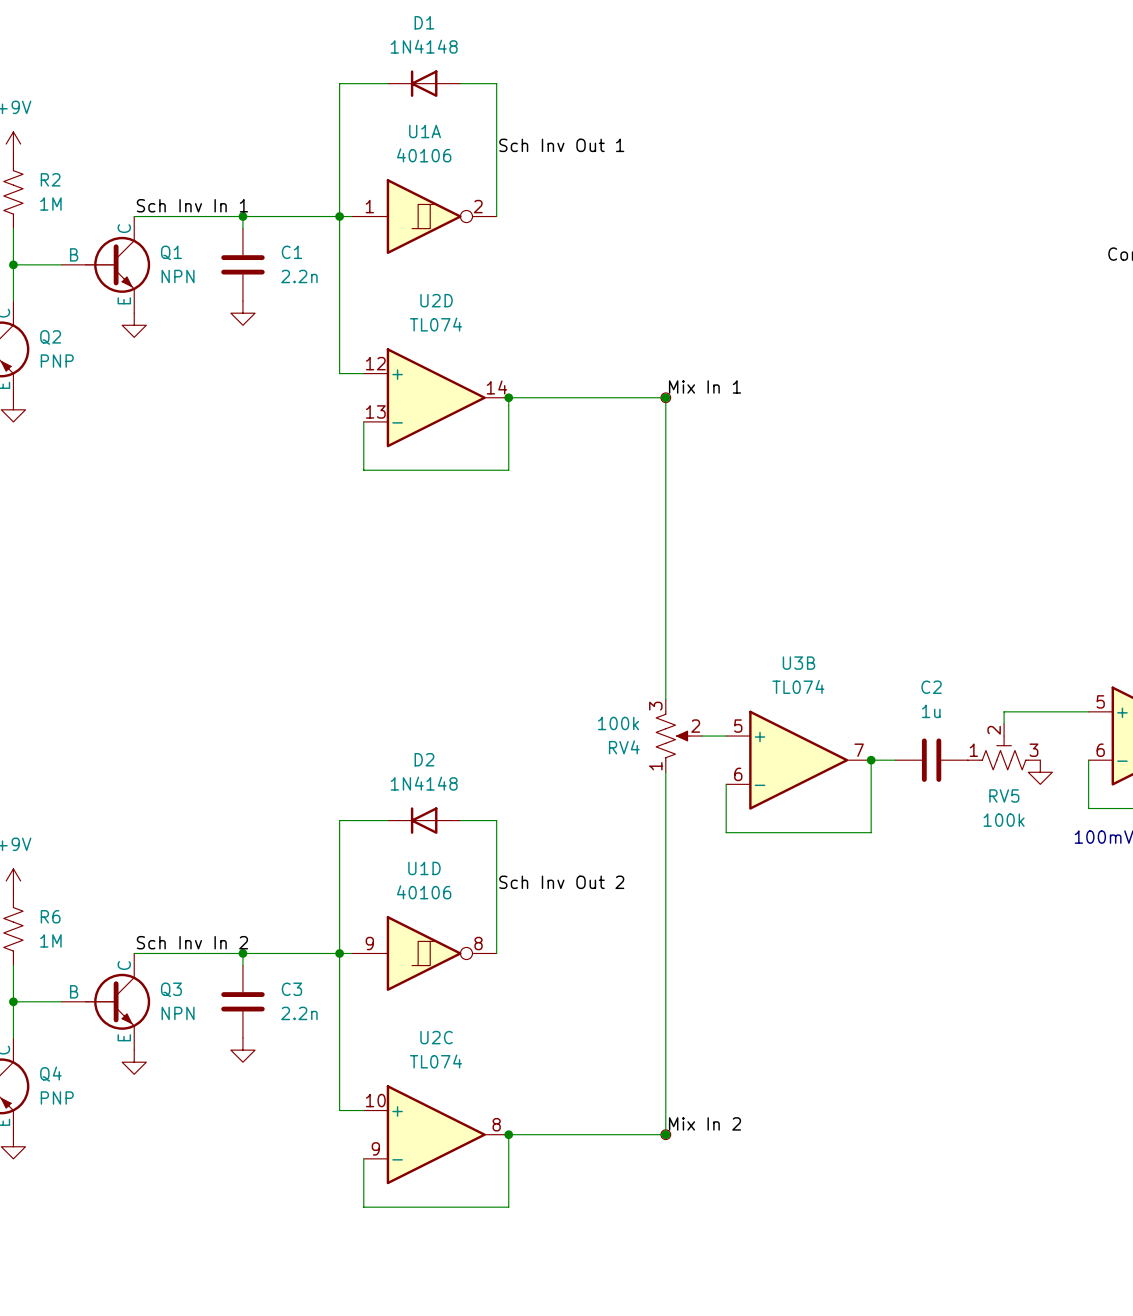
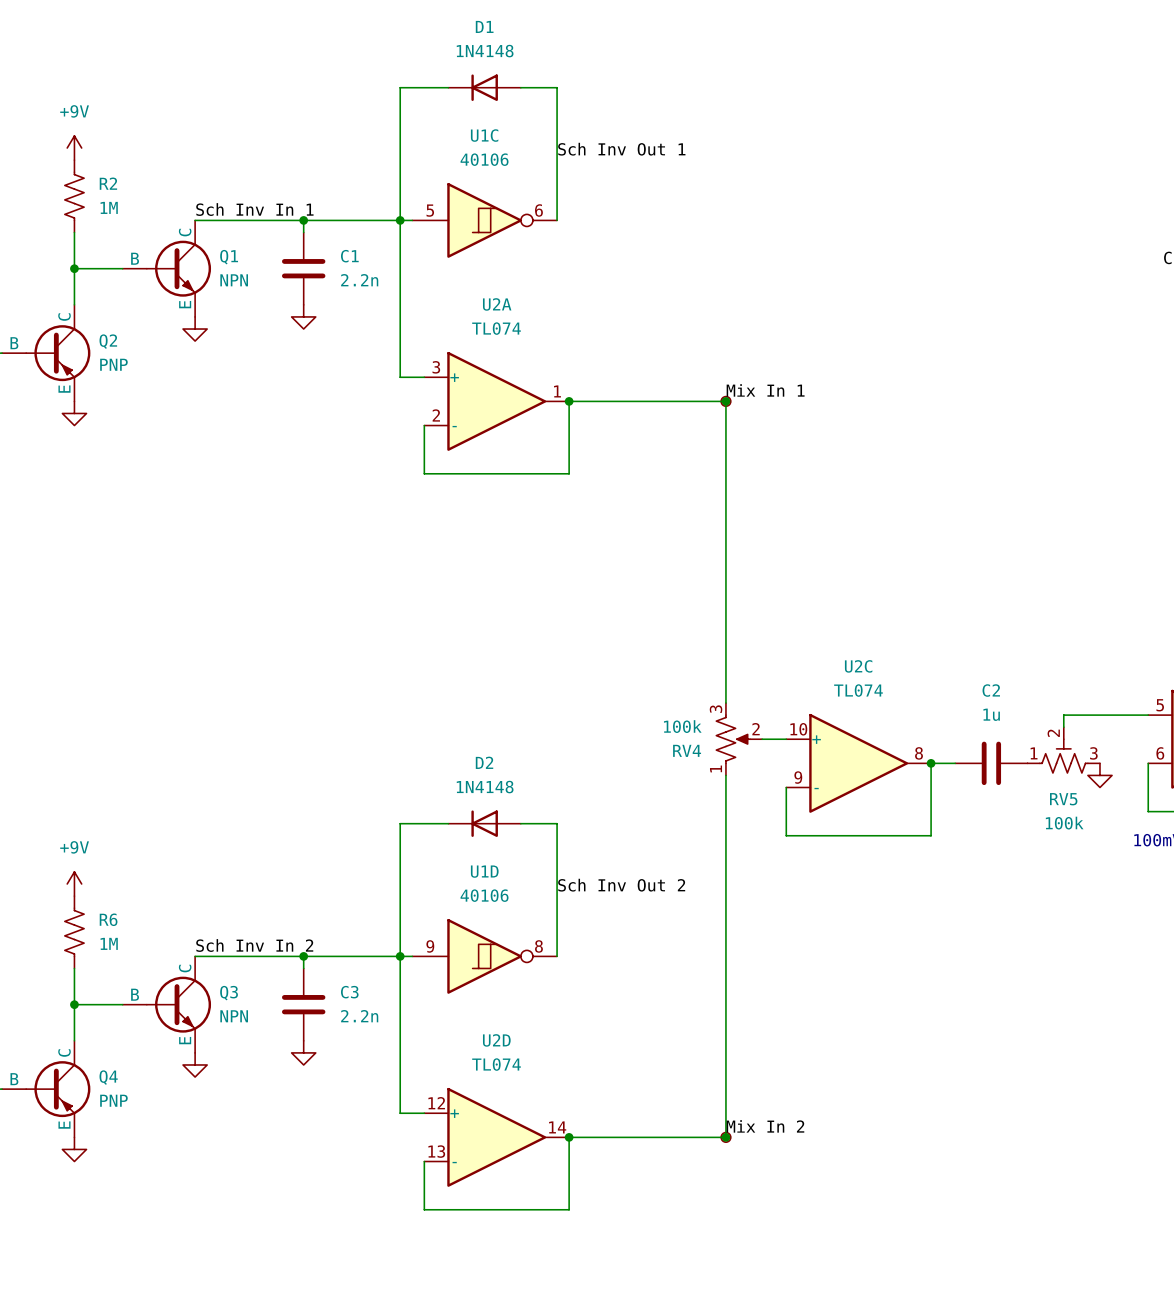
U1A name: U1A (425, 131) -> U1C (484, 135)
U1A pin number: 1 (369, 206) -> 5 (430, 210)
U1A pin number: 2 (478, 206) -> 6 (538, 210)
U2D position: (436, 397) -> (496, 1137)
U2A: none -> TL074 (496, 401)
U3B: TL074 (798, 760) -> none
U2C position: (436, 1134) -> (858, 763)

